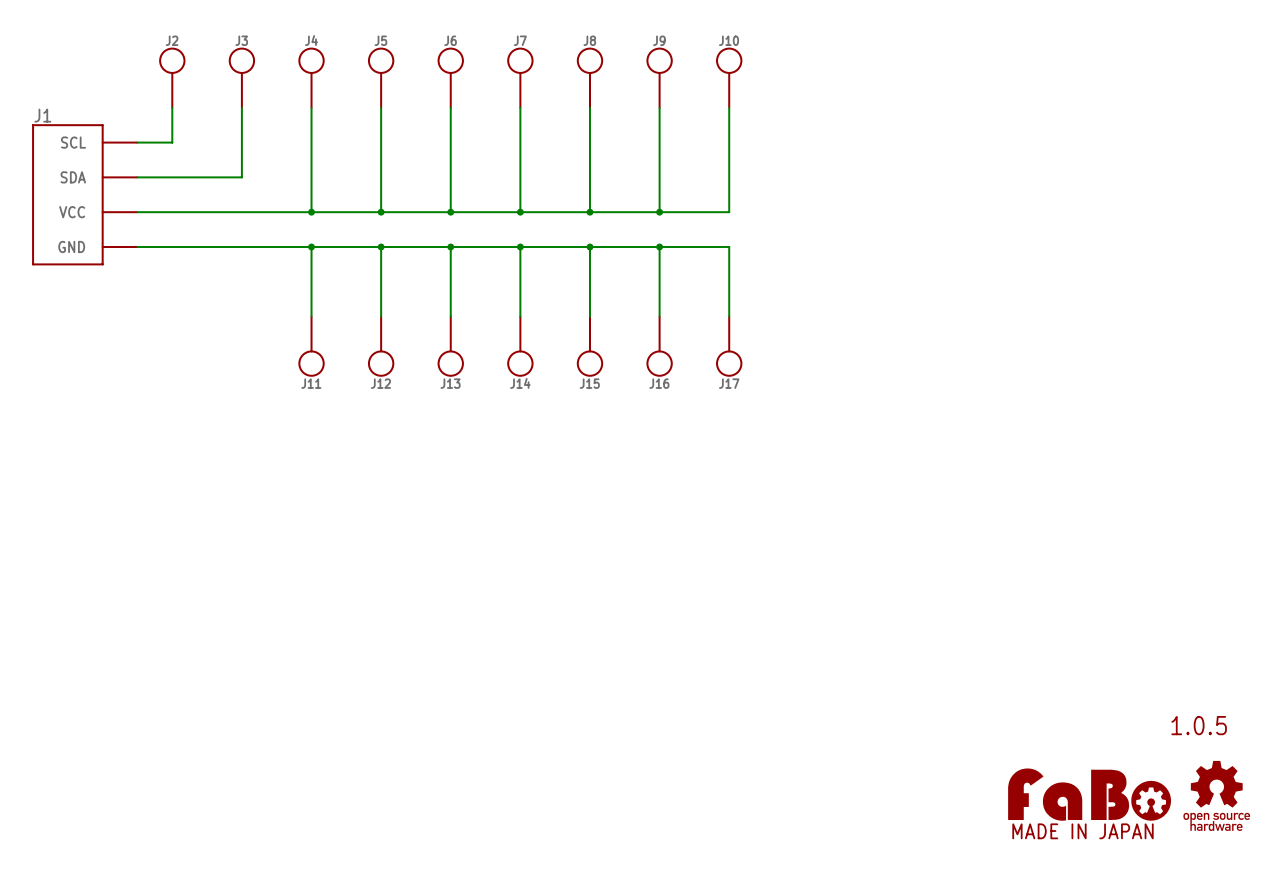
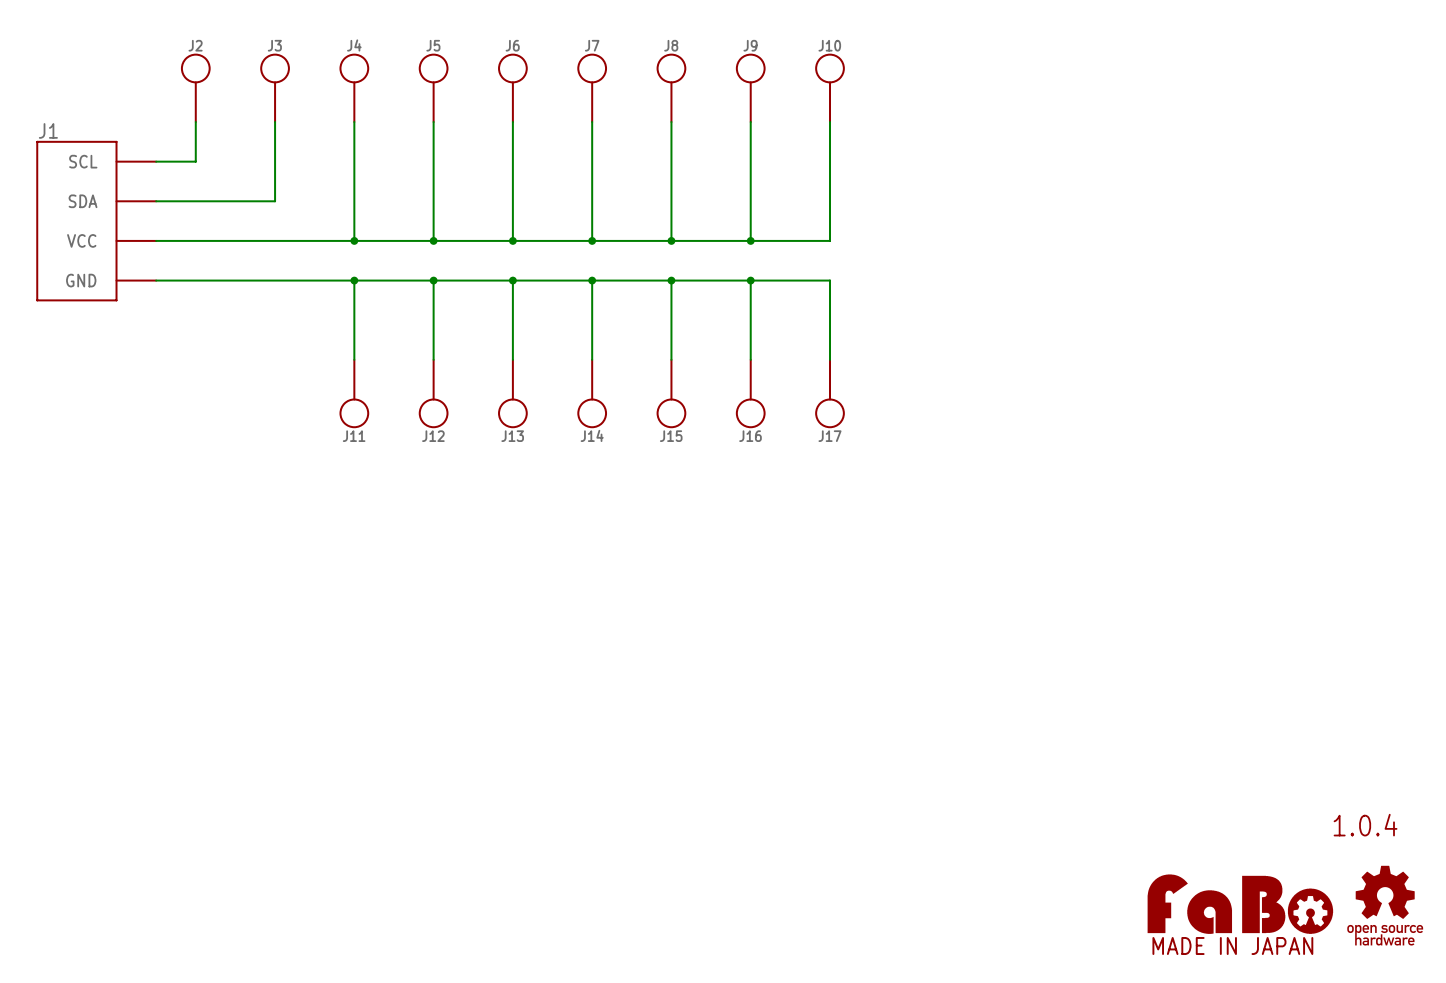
text: 1.0.5 (1199, 725) -> 1.0.4 (1365, 825)

